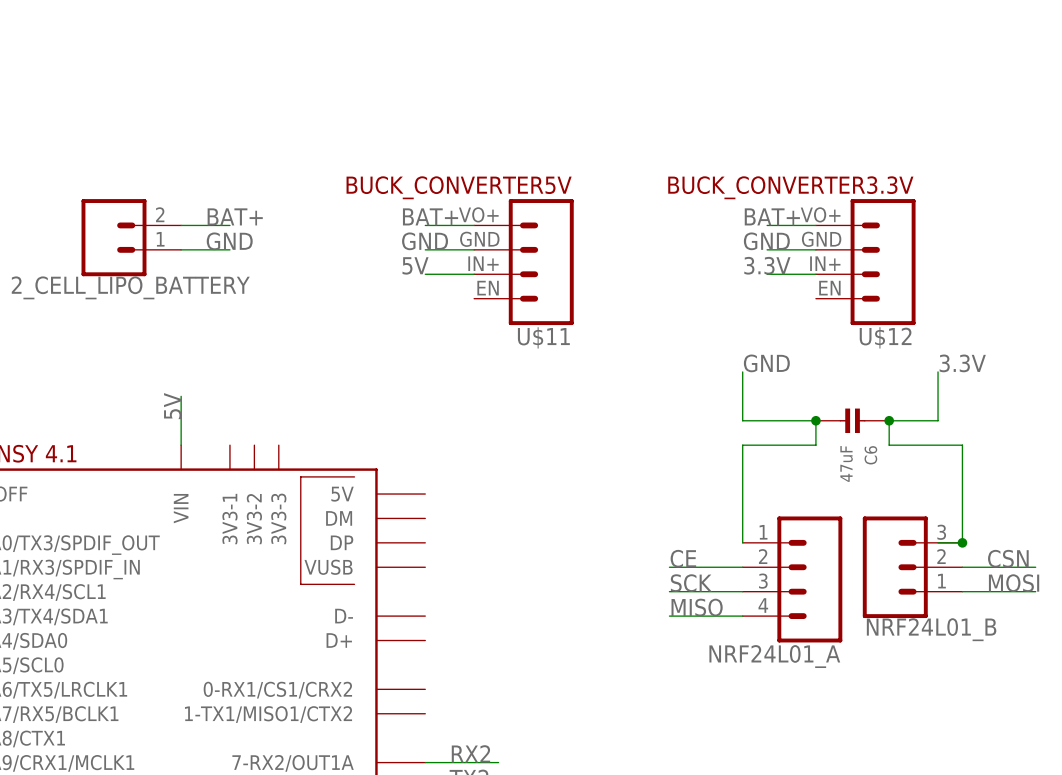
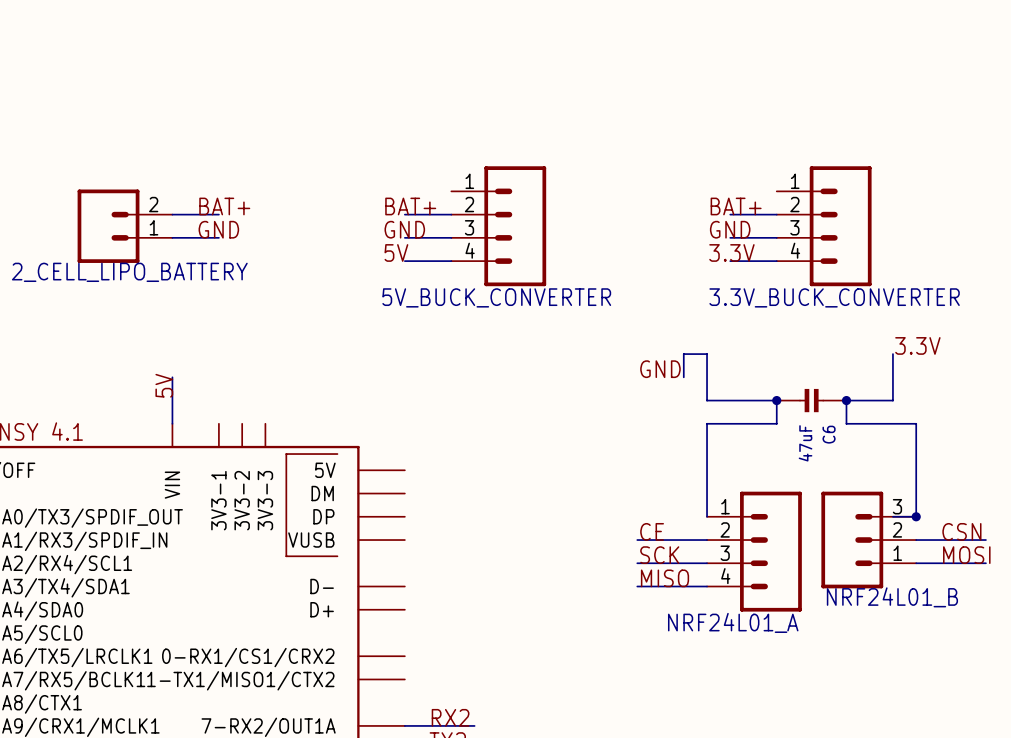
5V_BUCK_CONVERTER: none -> (498, 226)
3.3V_BUCK_CONVERTER: none -> (824, 226)
U$11: BUCK_CONVERTER5V (523, 262) -> none
U$12: BUCK_CONVERTER3.3V (865, 262) -> none
label position: GND (766, 363) -> GND (660, 369)
wire: none -> (707, 354) (683, 354) (683, 377)

